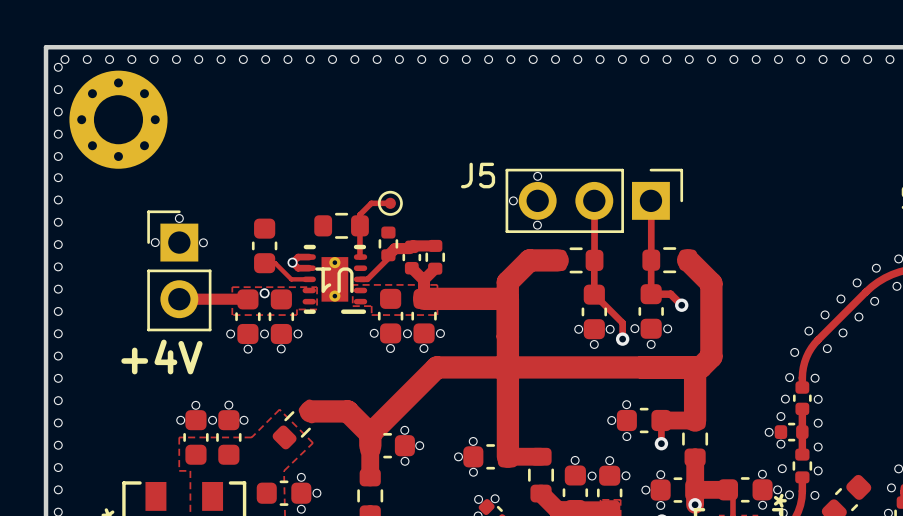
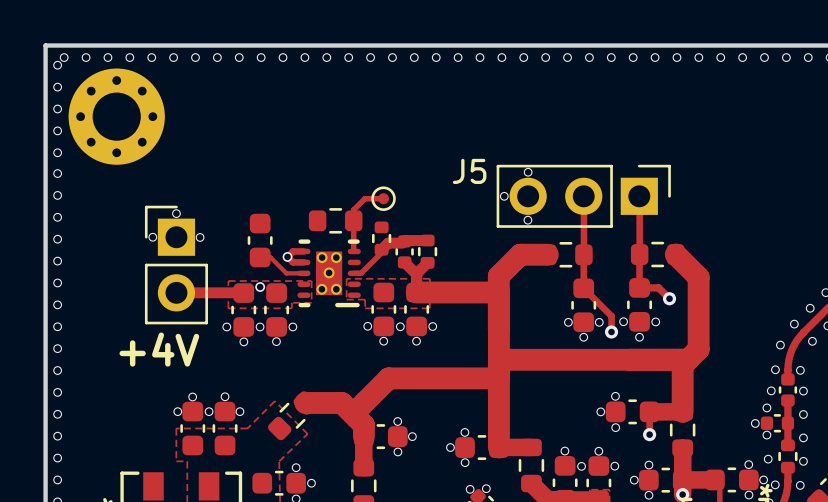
U1: (334, 279) -> none
part: none -> (329, 273)
track: (507, 367) (436, 367) (370, 433) -> none
track: none -> (498, 377) (388, 378) (356, 410) (356, 417)

